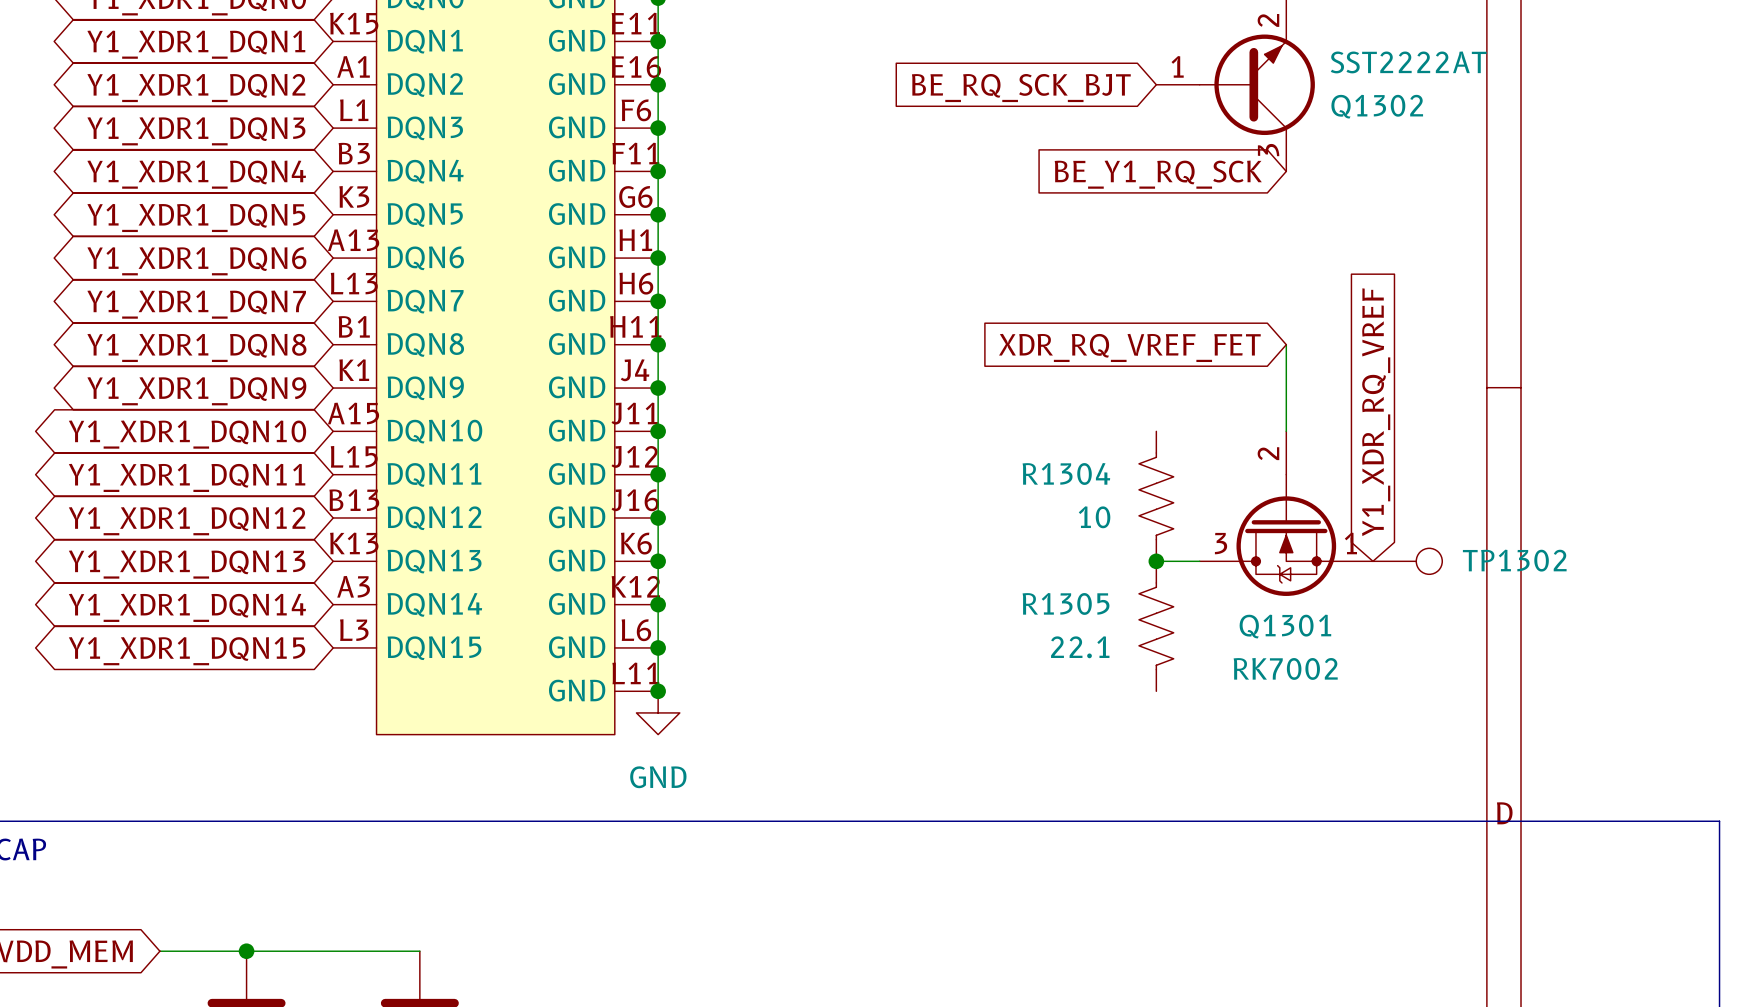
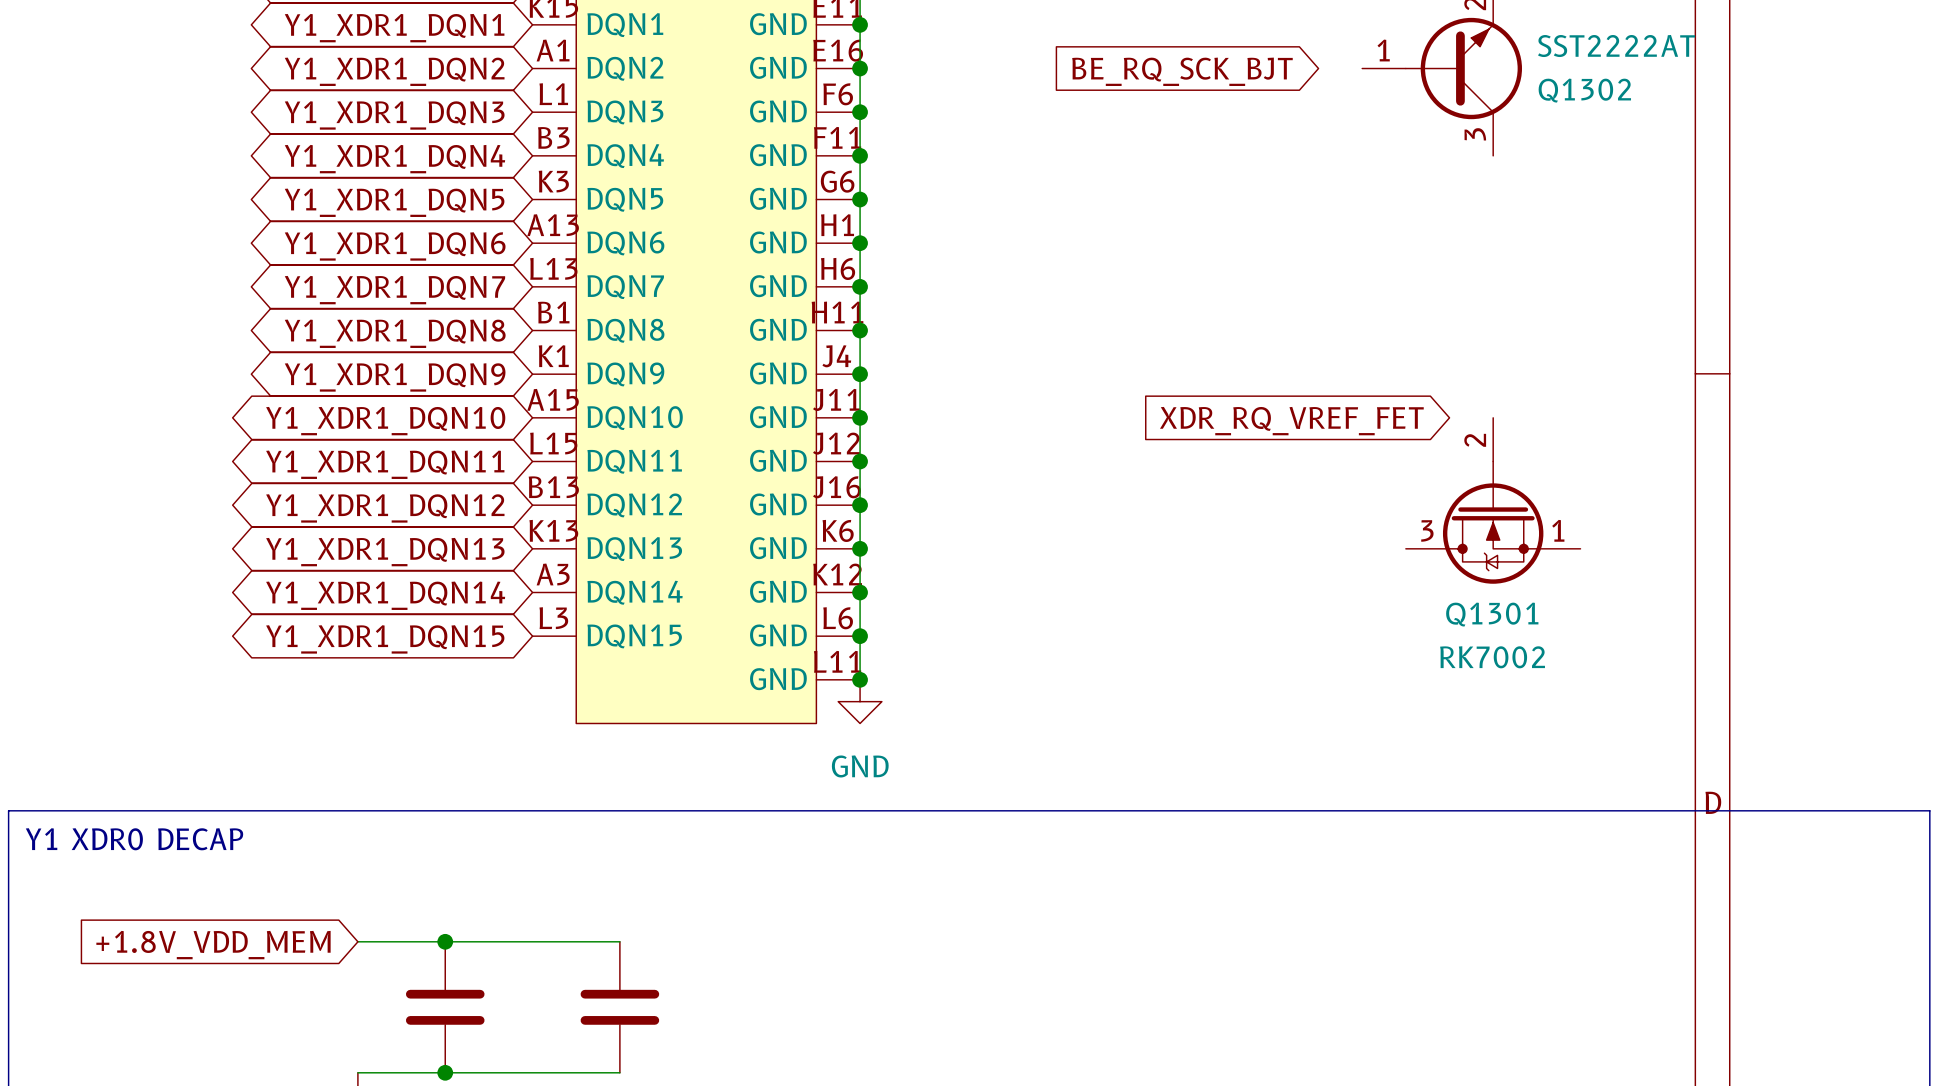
global label position: BE_RQ_SCK_BJT (1021, 88) -> BE_RQ_SCK_BJT (1182, 71)
global label: BE_Y1_RQ_SCK (1158, 174) -> none
wire: (1286, 344) (1286, 431) -> none
global label position: XDR_RQ_VREF_FET (1129, 347) -> XDR_RQ_VREF_FET (1291, 421)
global label: Y1_XDR_RQ_VREF (1376, 412) -> none
R1304: 10 (1156, 496) -> none
wire: (1156, 561) (1199, 561) -> none
junction: (1156, 561) -> none
TP1302: (1407, 561) -> none
R1305: 22.1 (1156, 626) -> none

